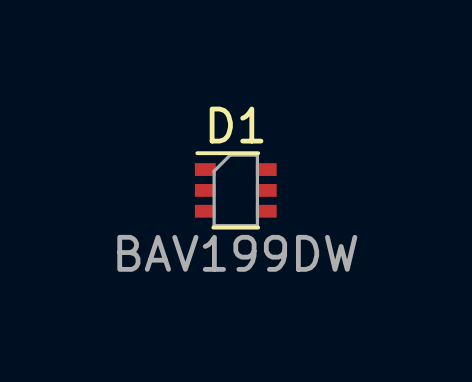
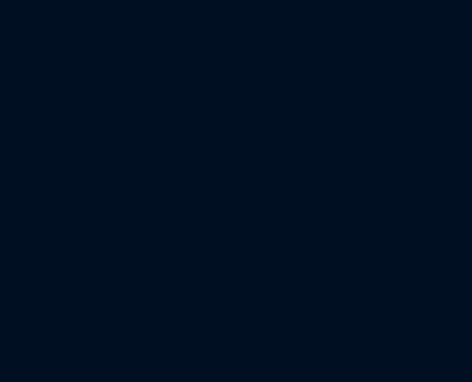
D1: BAV199DW (235, 190) -> none

